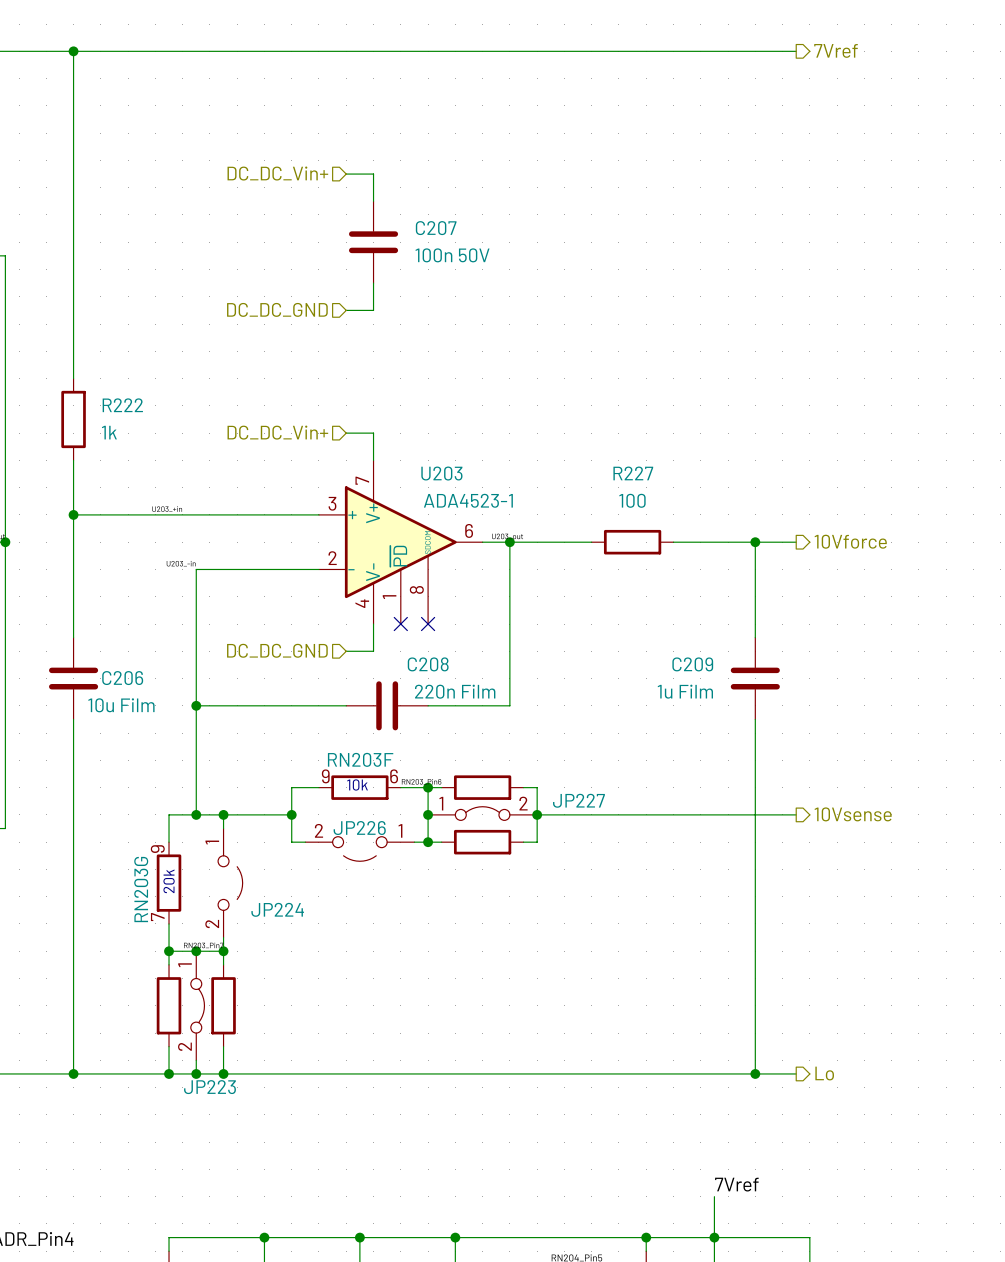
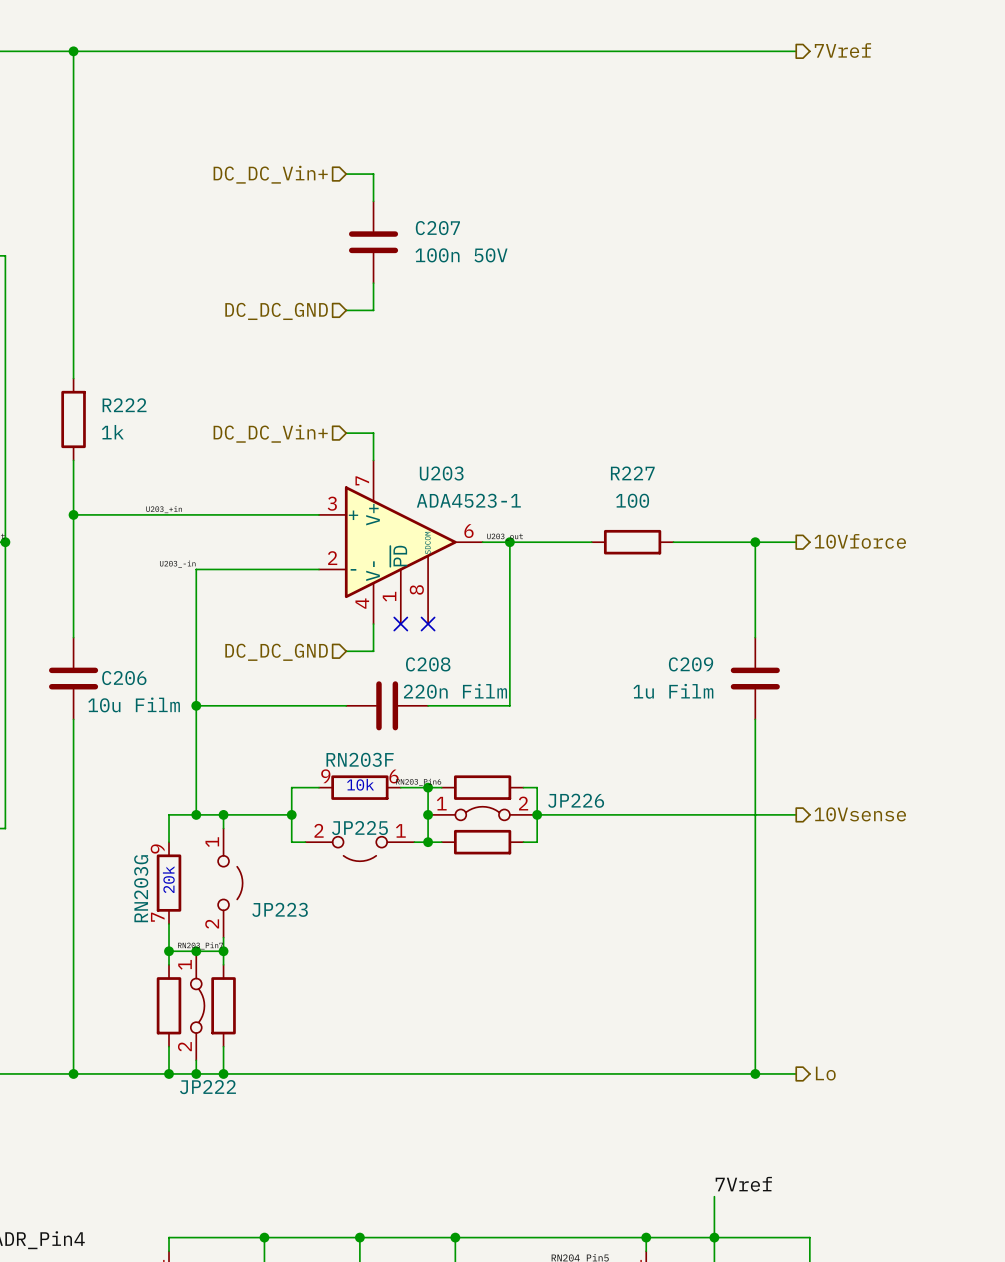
JP227 name: JP227 (578, 800) -> JP226 (576, 800)
JP226 name: JP226 (359, 828) -> JP225 (359, 828)
JP224 name: JP224 (277, 909) -> JP223 (280, 909)
JP223 name: JP223 (209, 1087) -> JP222 (207, 1087)

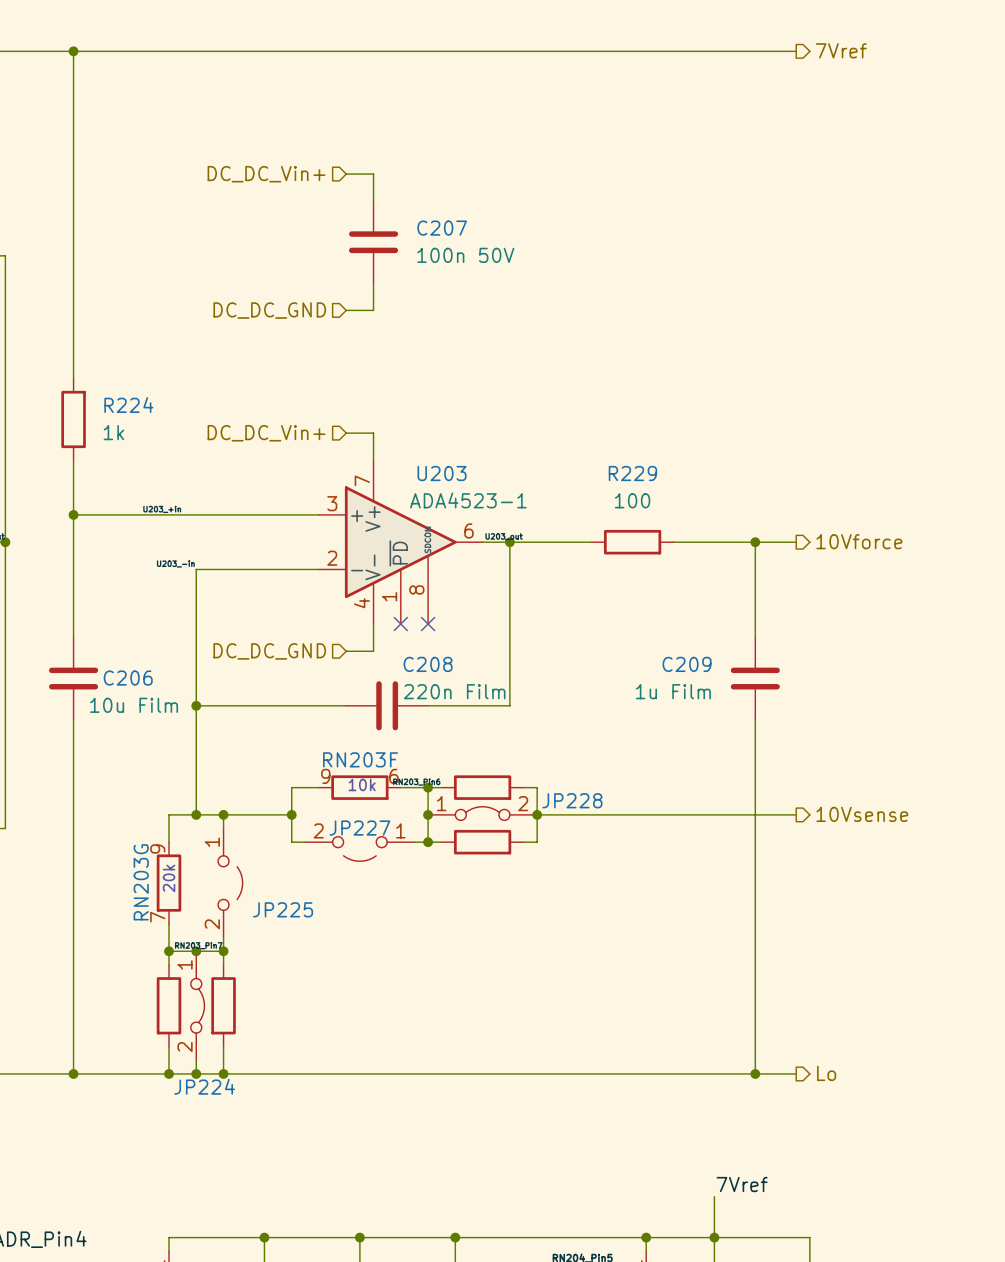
R222 name: R222 (124, 405) -> R224 (128, 405)
R227 name: R227 (632, 473) -> R229 (632, 473)
JP226 name: JP226 (576, 800) -> JP228 (572, 800)
JP225 name: JP225 (359, 828) -> JP227 (359, 828)
JP223 name: JP223 (280, 909) -> JP225 (283, 909)
JP222 name: JP222 (207, 1087) -> JP224 (204, 1086)

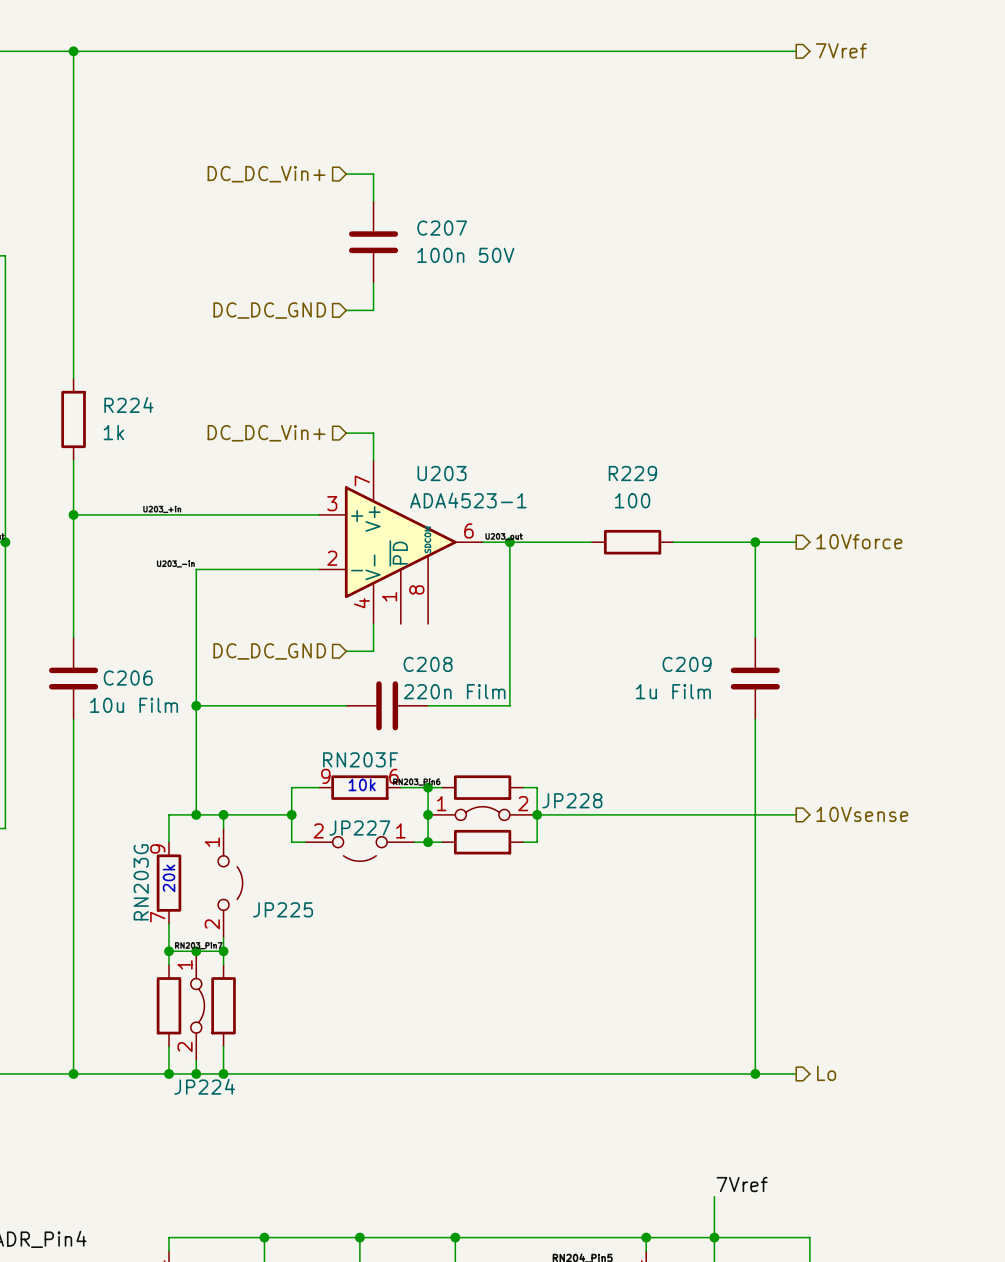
no-connect mark: (400, 624) -> none
no-connect mark: (428, 624) -> none

